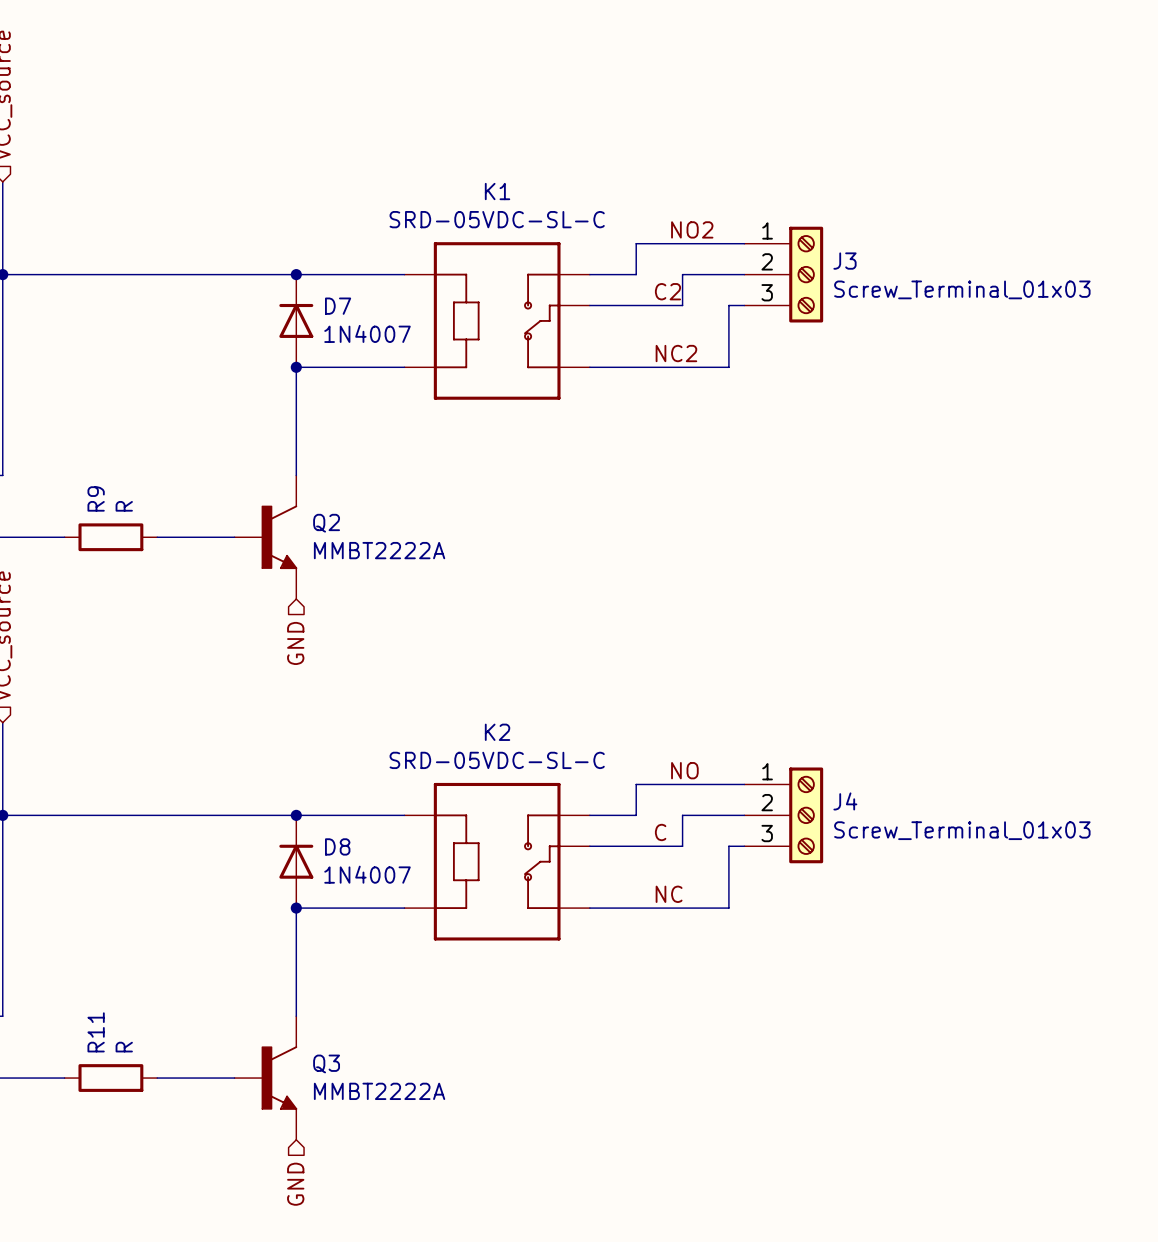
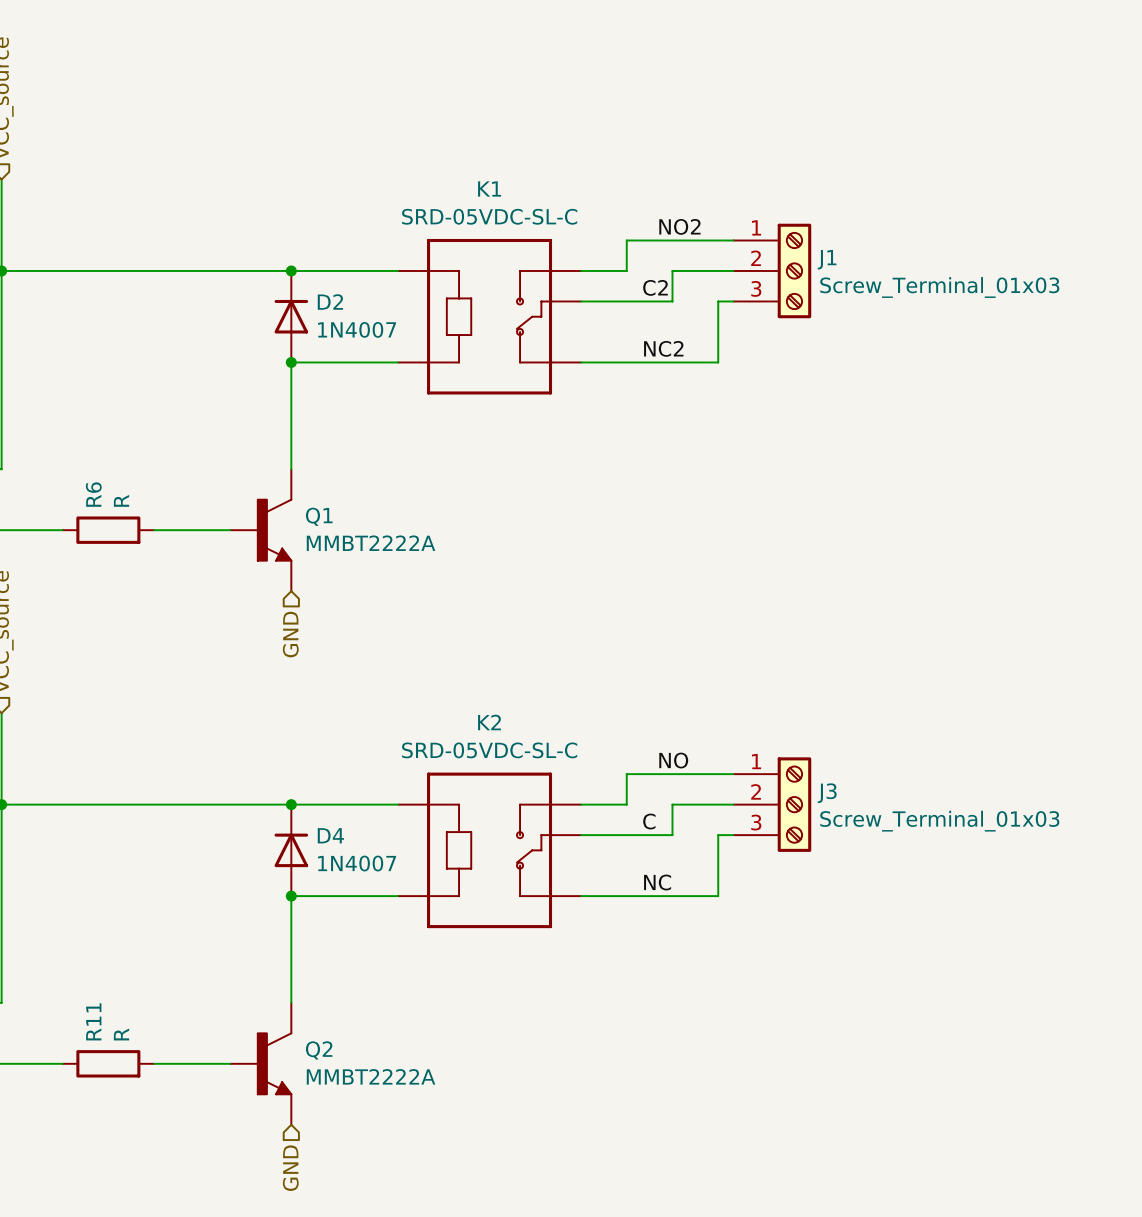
J3 name: J3 (844, 261) -> J1 (827, 259)
D7 name: D7 (338, 306) -> D2 (330, 301)
R9 name: R9 (96, 498) -> R6 (93, 494)
Q2 name: Q2 (326, 523) -> Q1 (319, 516)
J4 name: J4 (845, 801) -> J3 (827, 793)
D8 name: D8 (337, 846) -> D4 (330, 835)
Q3 name: Q3 (326, 1063) -> Q2 (319, 1050)

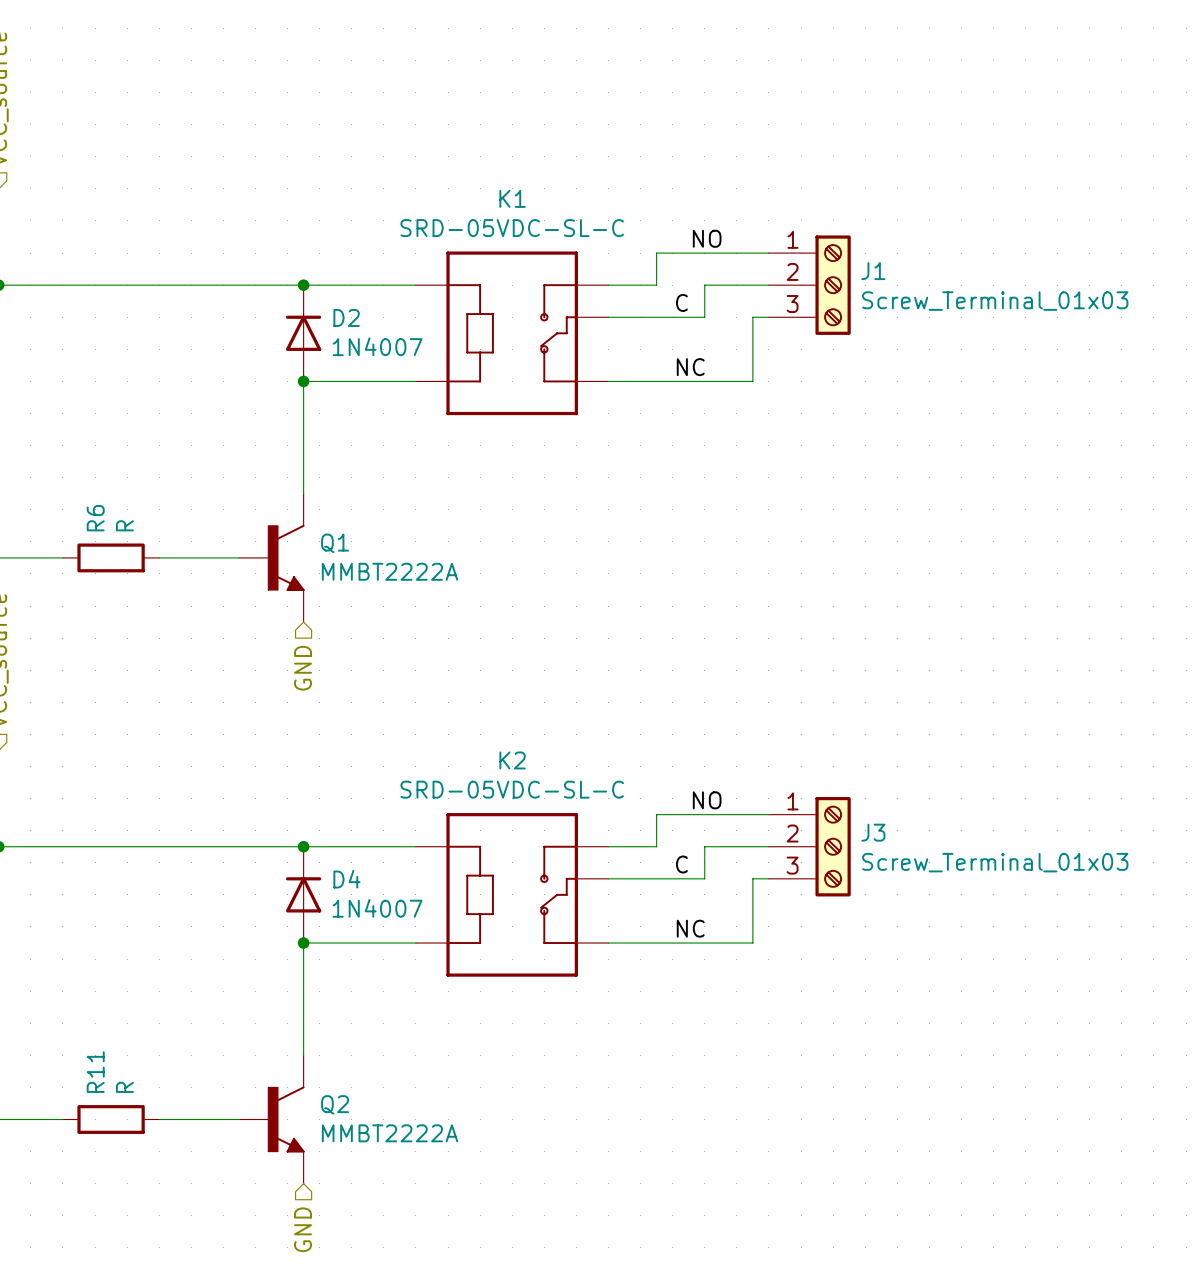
label: NO2 (679, 226) -> NO (707, 238)
label: C2 (655, 287) -> C (681, 302)
label: NC2 (663, 348) -> NC (690, 367)

